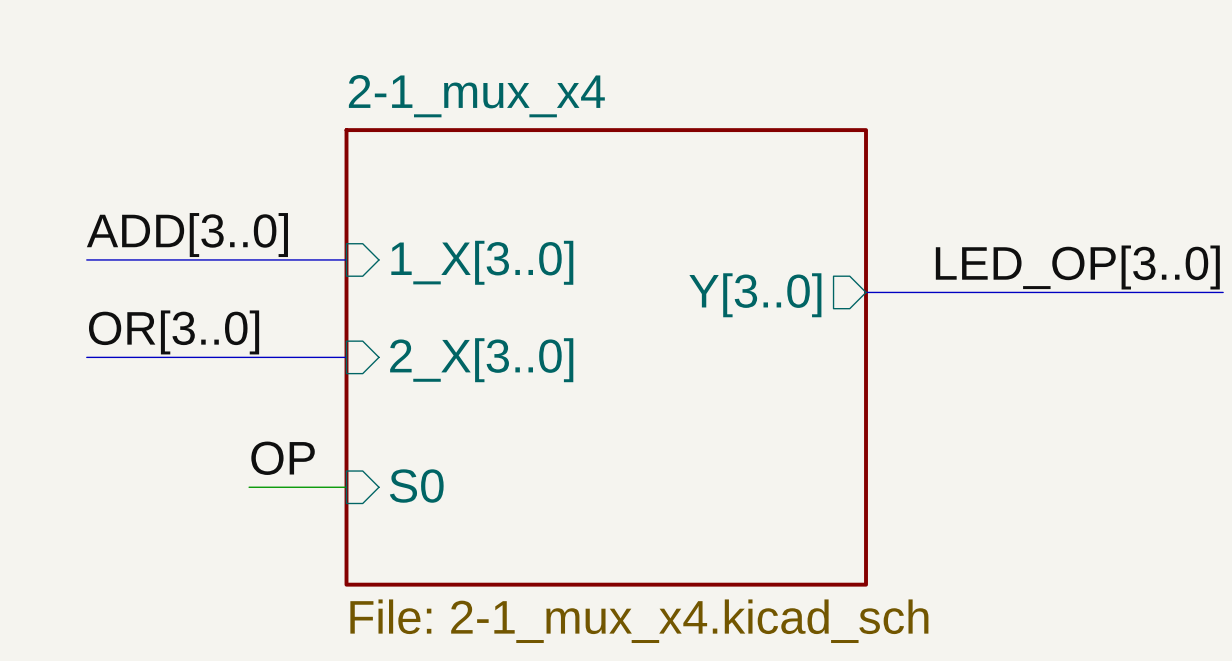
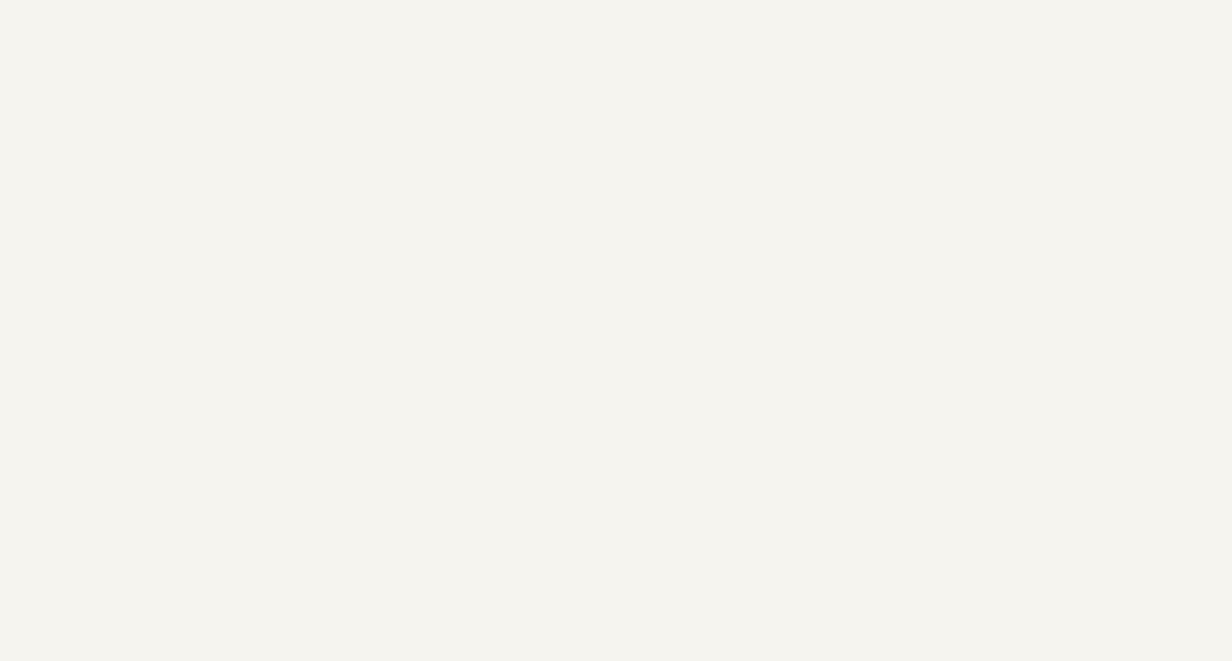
label: ADD[3..0] (187, 235) -> none
bus: (86, 259) (346, 259) -> none
sheet pin: 1_X[3..0] (482, 262) -> none
label: LED_OP[3..0] (1077, 267) -> none
bus: (866, 292) (1223, 292) -> none
sheet pin: Y[3..0] (755, 295) -> none
label: OR[3..0] (174, 332) -> none
bus: (86, 357) (346, 357) -> none
sheet 2-1_mux_x4: File: 2-1_mux_x4.kicad_sch (606, 357) -> none
sheet pin: 2_X[3..0] (481, 360) -> none
label: OP (283, 458) -> none
sheet pin: S0 (416, 486) -> none
wire: (249, 487) (346, 487) -> none

